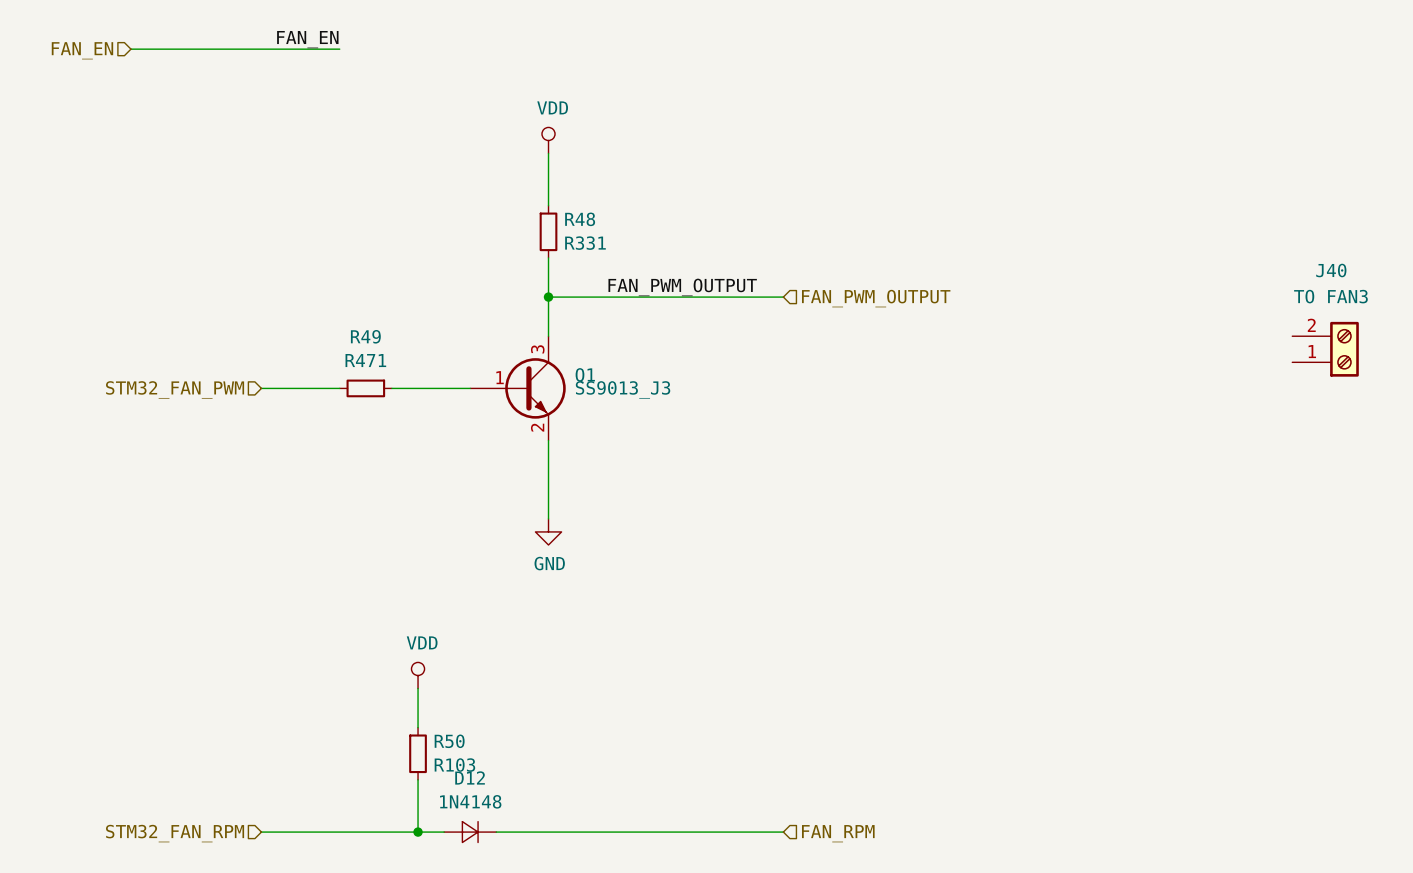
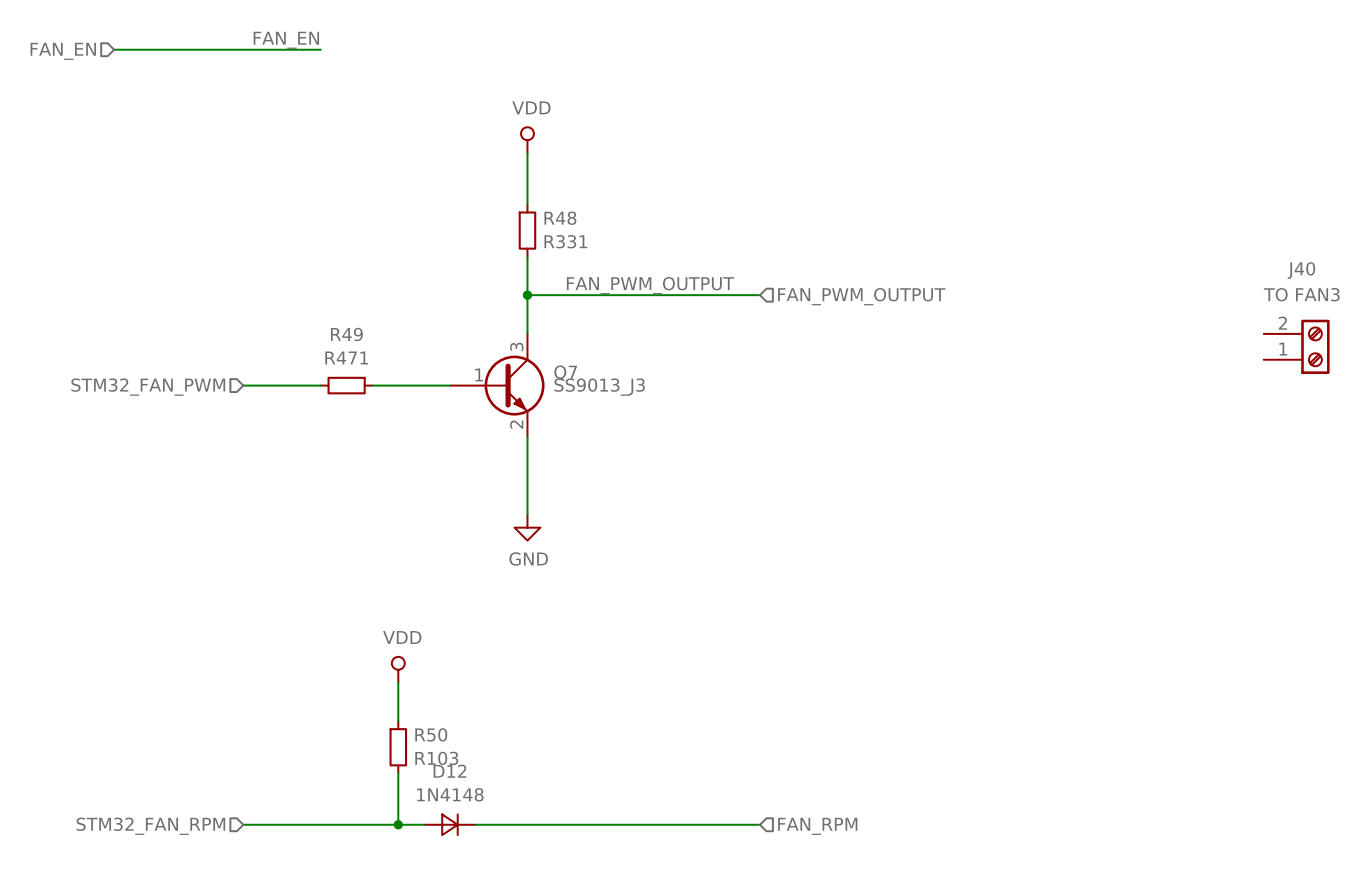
Q1 name: Q1 (585, 375) -> Q7 (565, 373)

